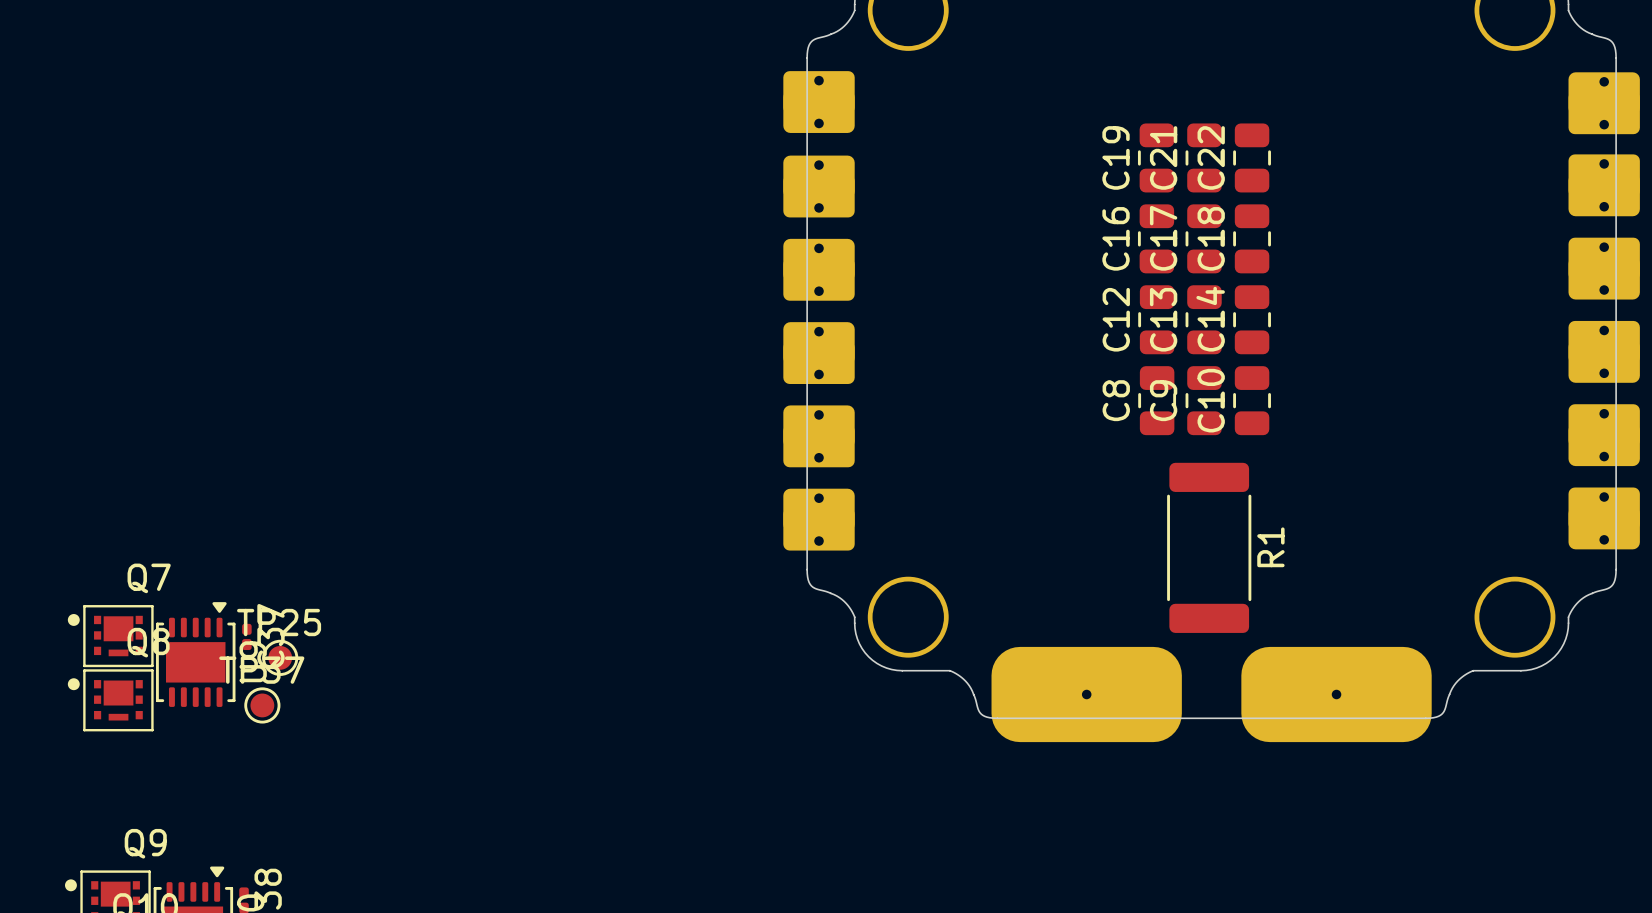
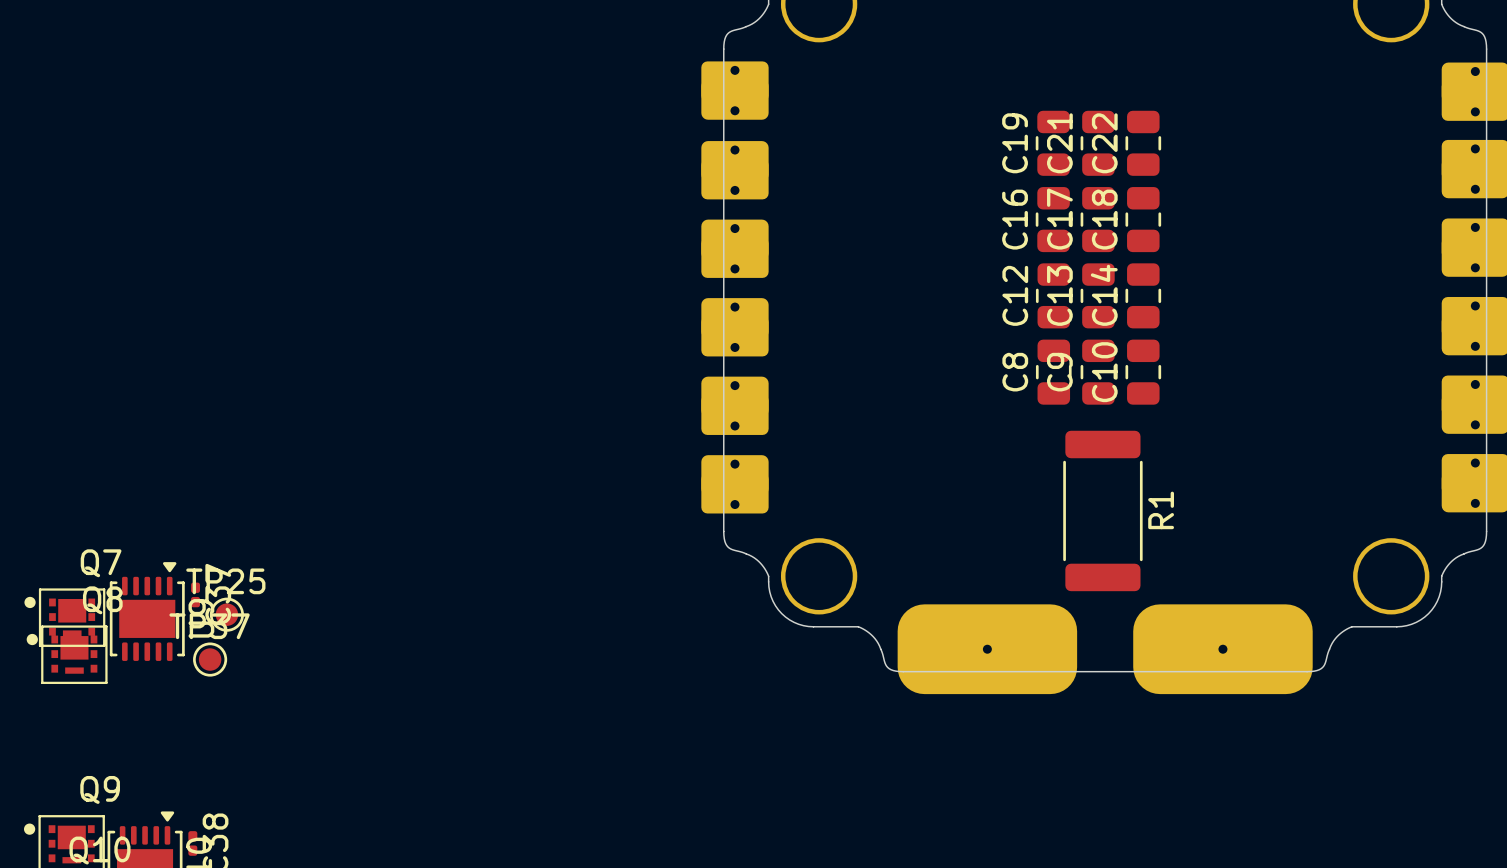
Q7 position: (110, 636) -> (64, 617)

